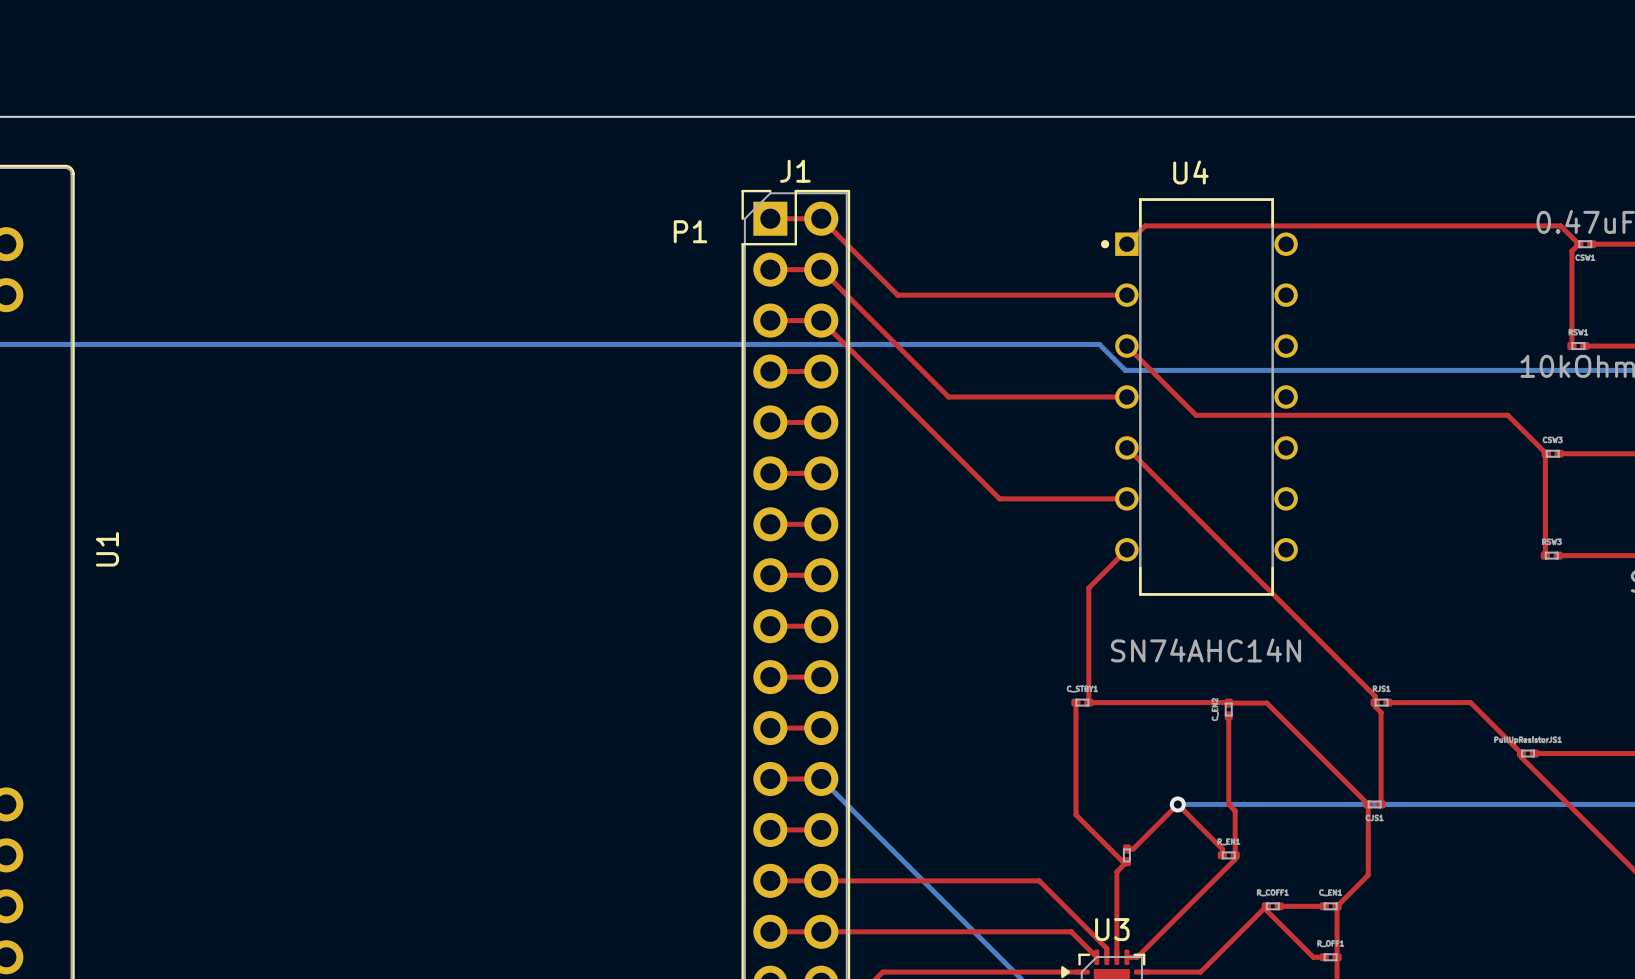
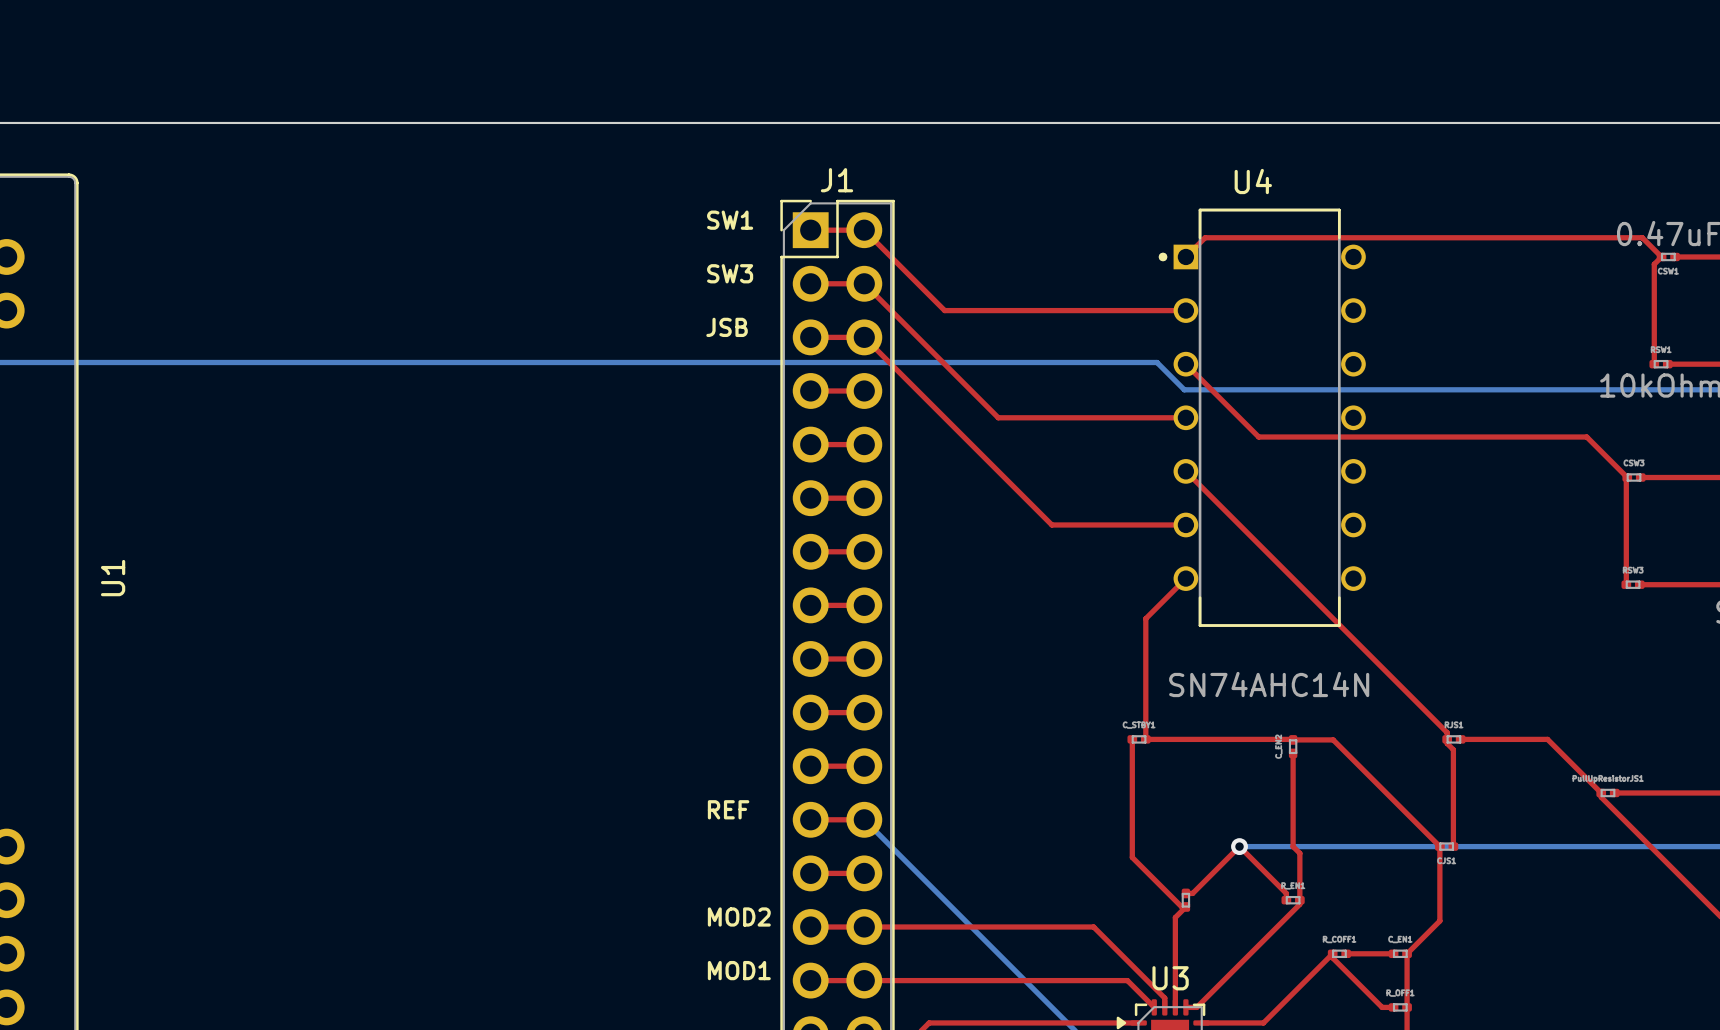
text: none -> SW1 (730, 220)
text: P1 (690, 231) -> none
text: none -> SW3 (730, 273)
text: none -> JSB (727, 327)
text: none -> REF (728, 809)
text: none -> MOD2 (739, 916)
text: none -> MOD1 (739, 970)

